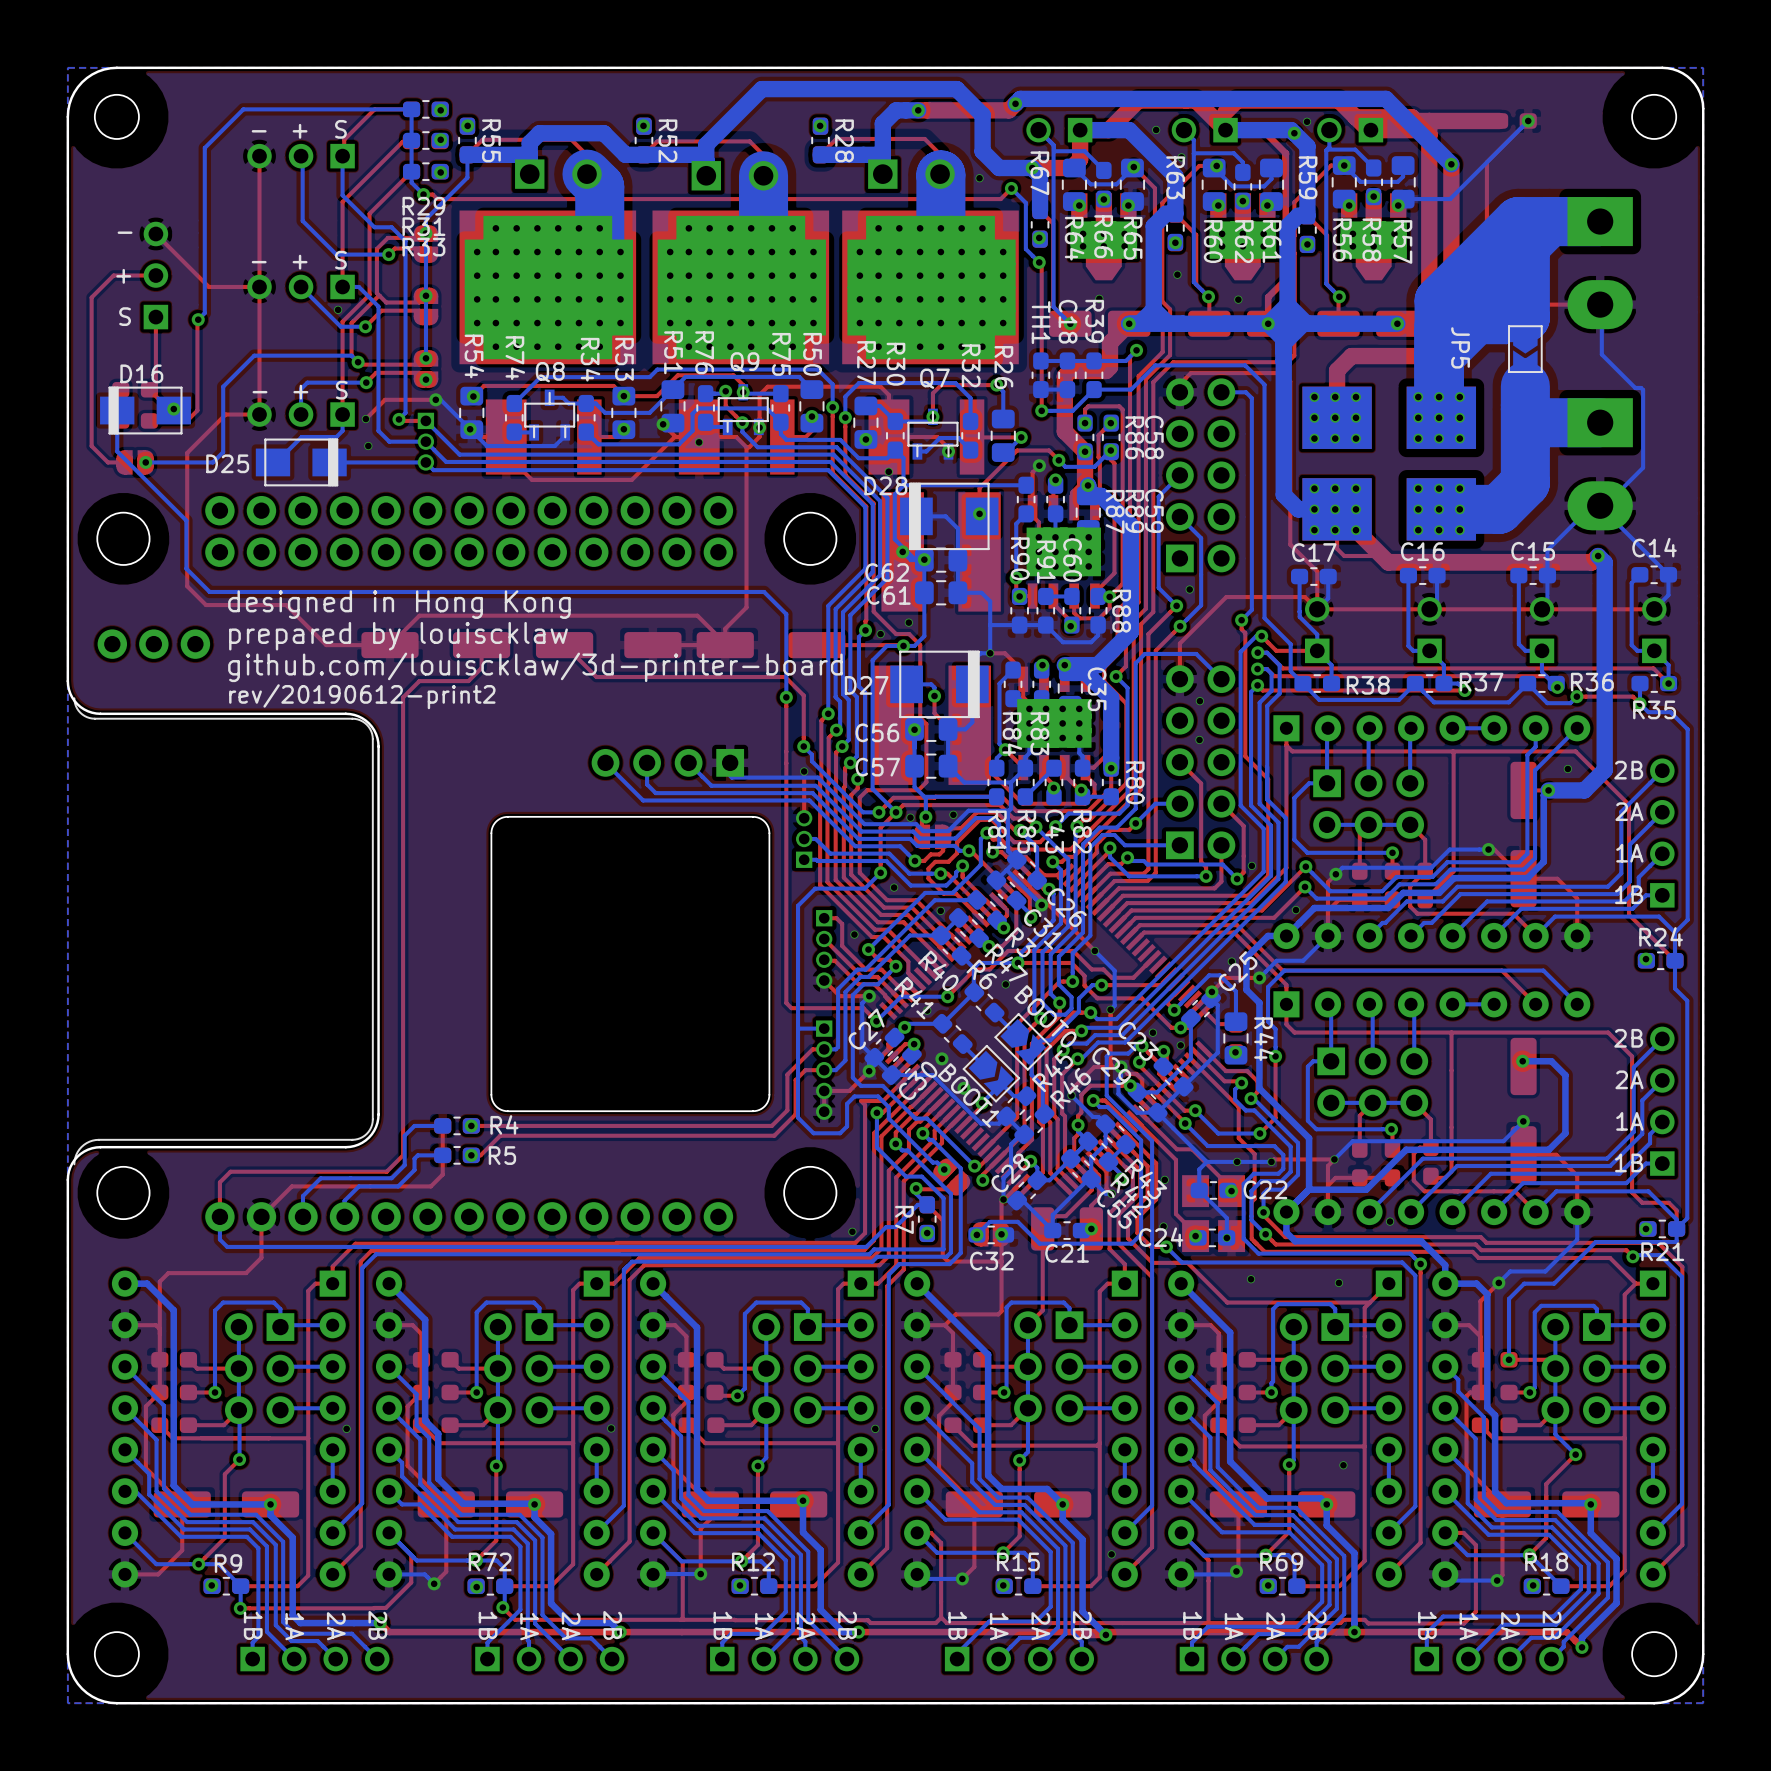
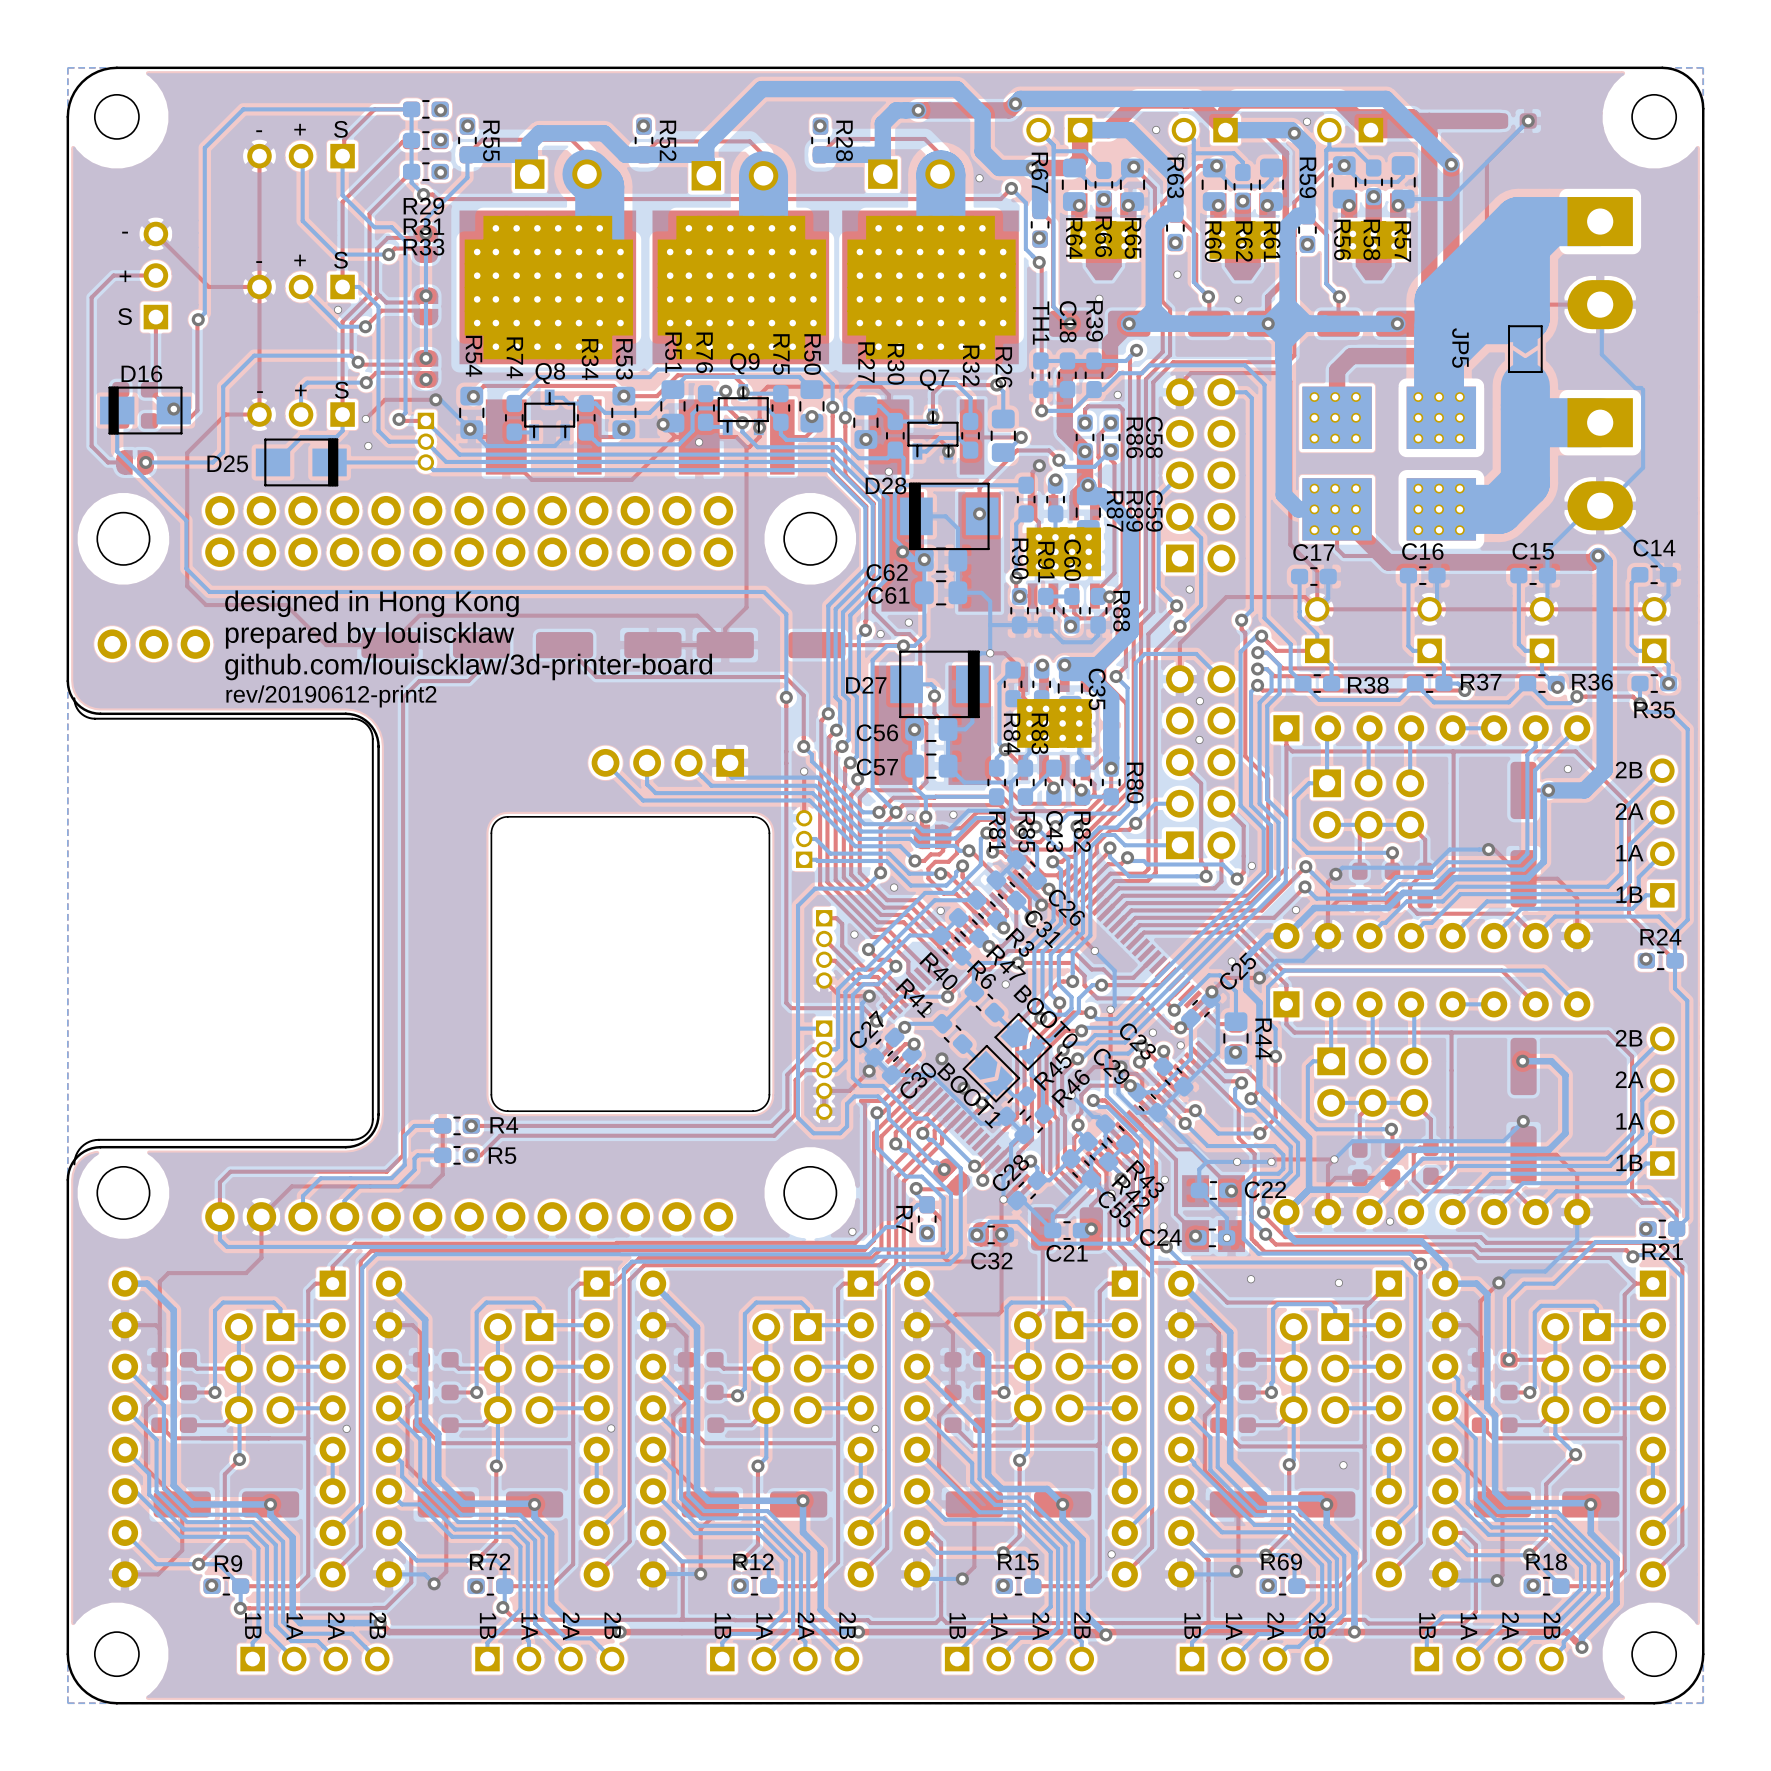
bottom track: (1155, 365) (1131, 389) (1103, 389) -> (1155, 365) (1149, 365) (1141, 373) (1119, 373) (1103, 389)
via: none -> (1117, 394)

